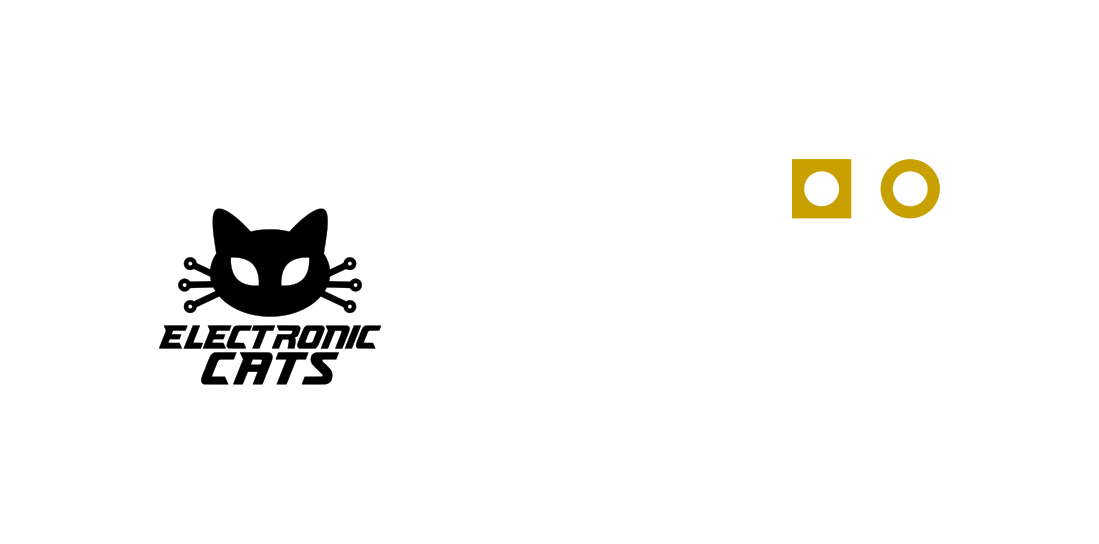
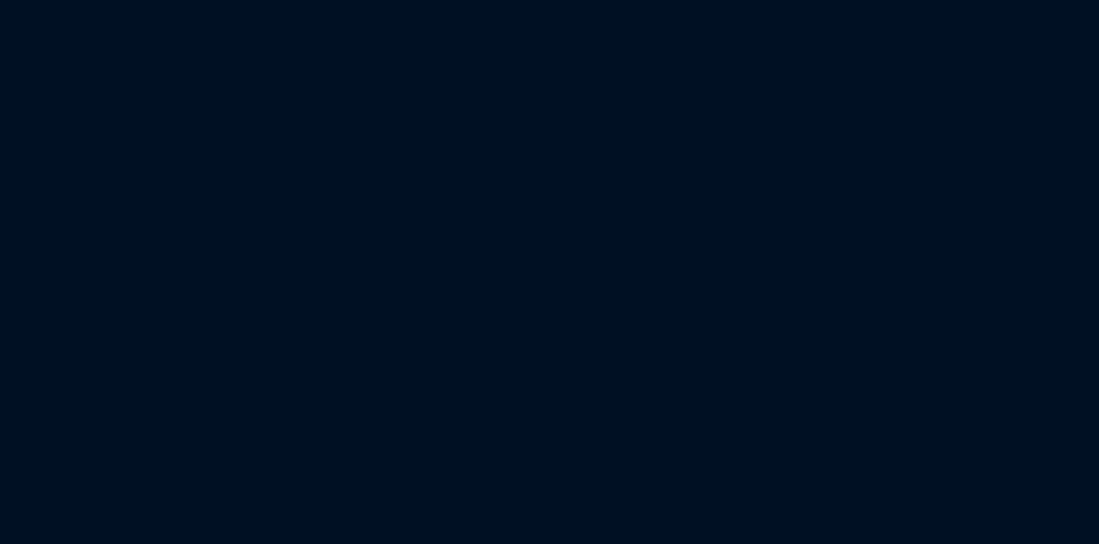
part: (865, 188) -> none
drawing: [159, 208, 381, 385] -> none

